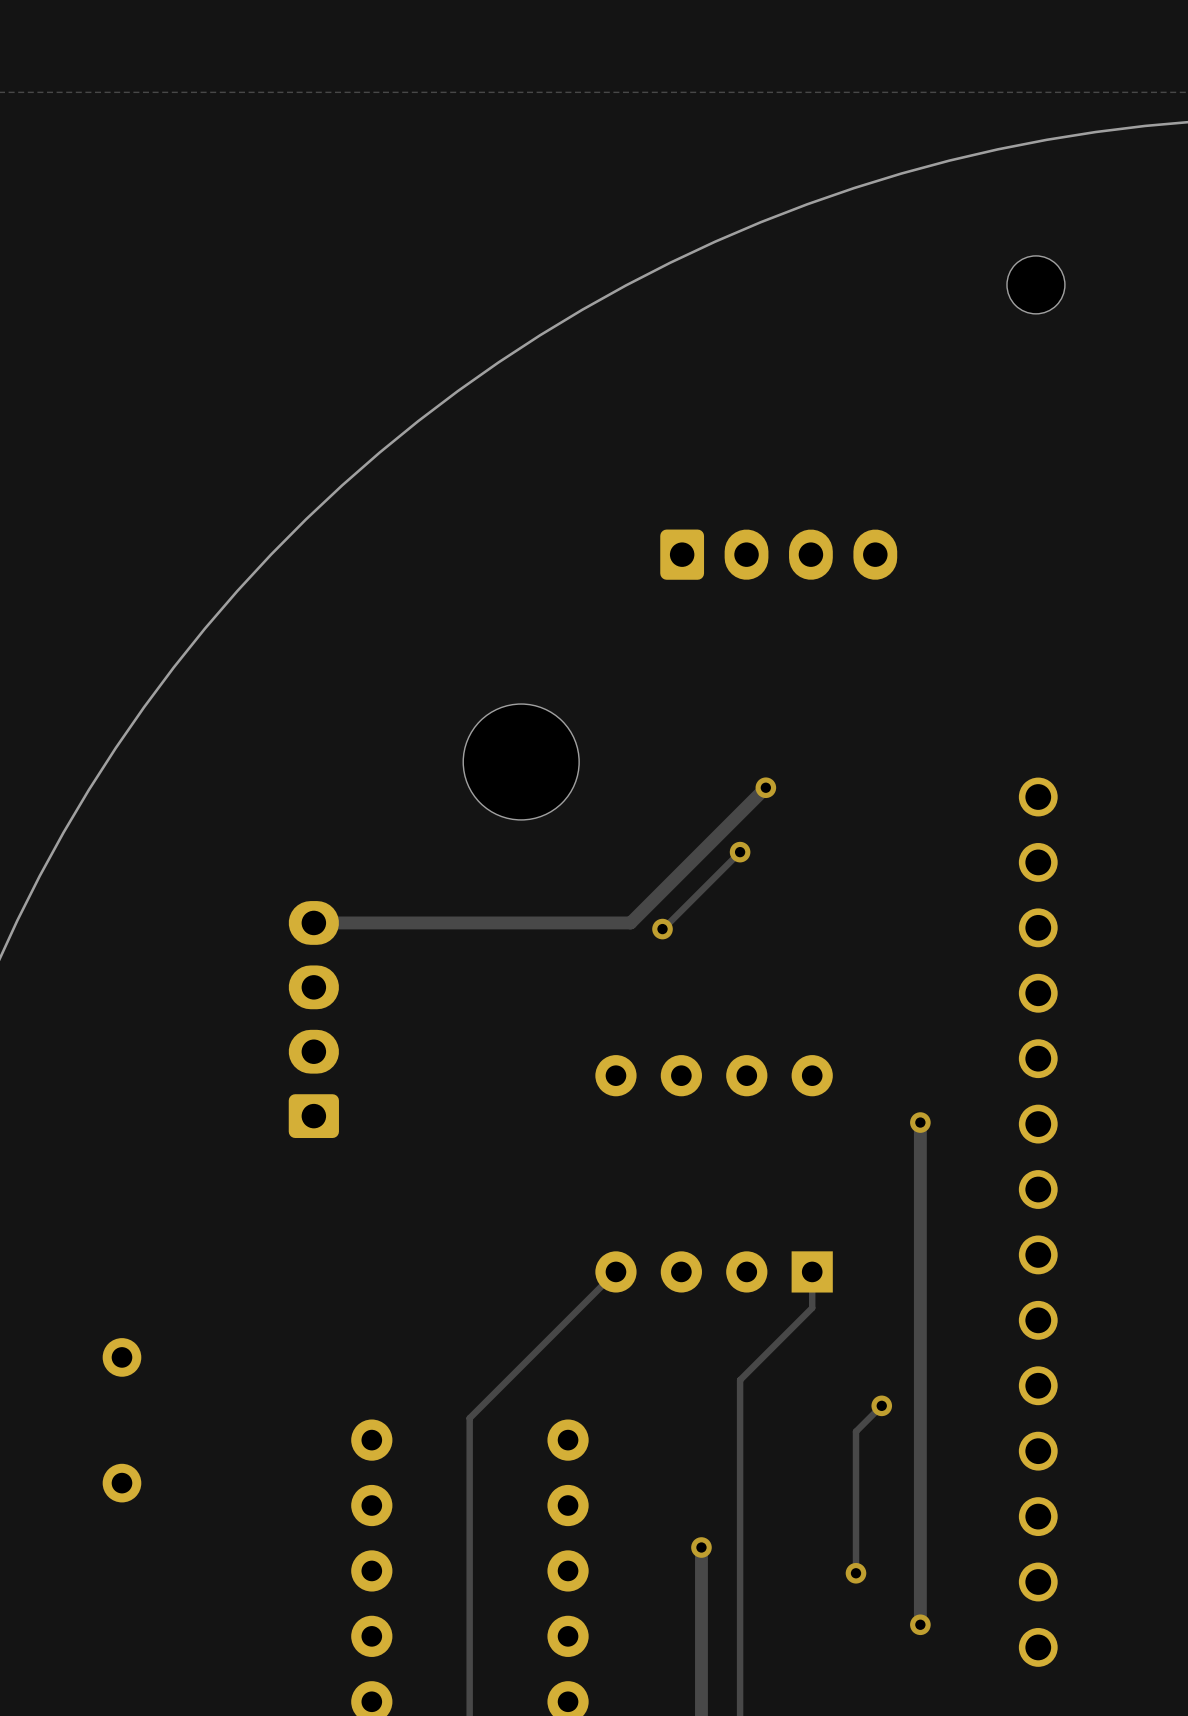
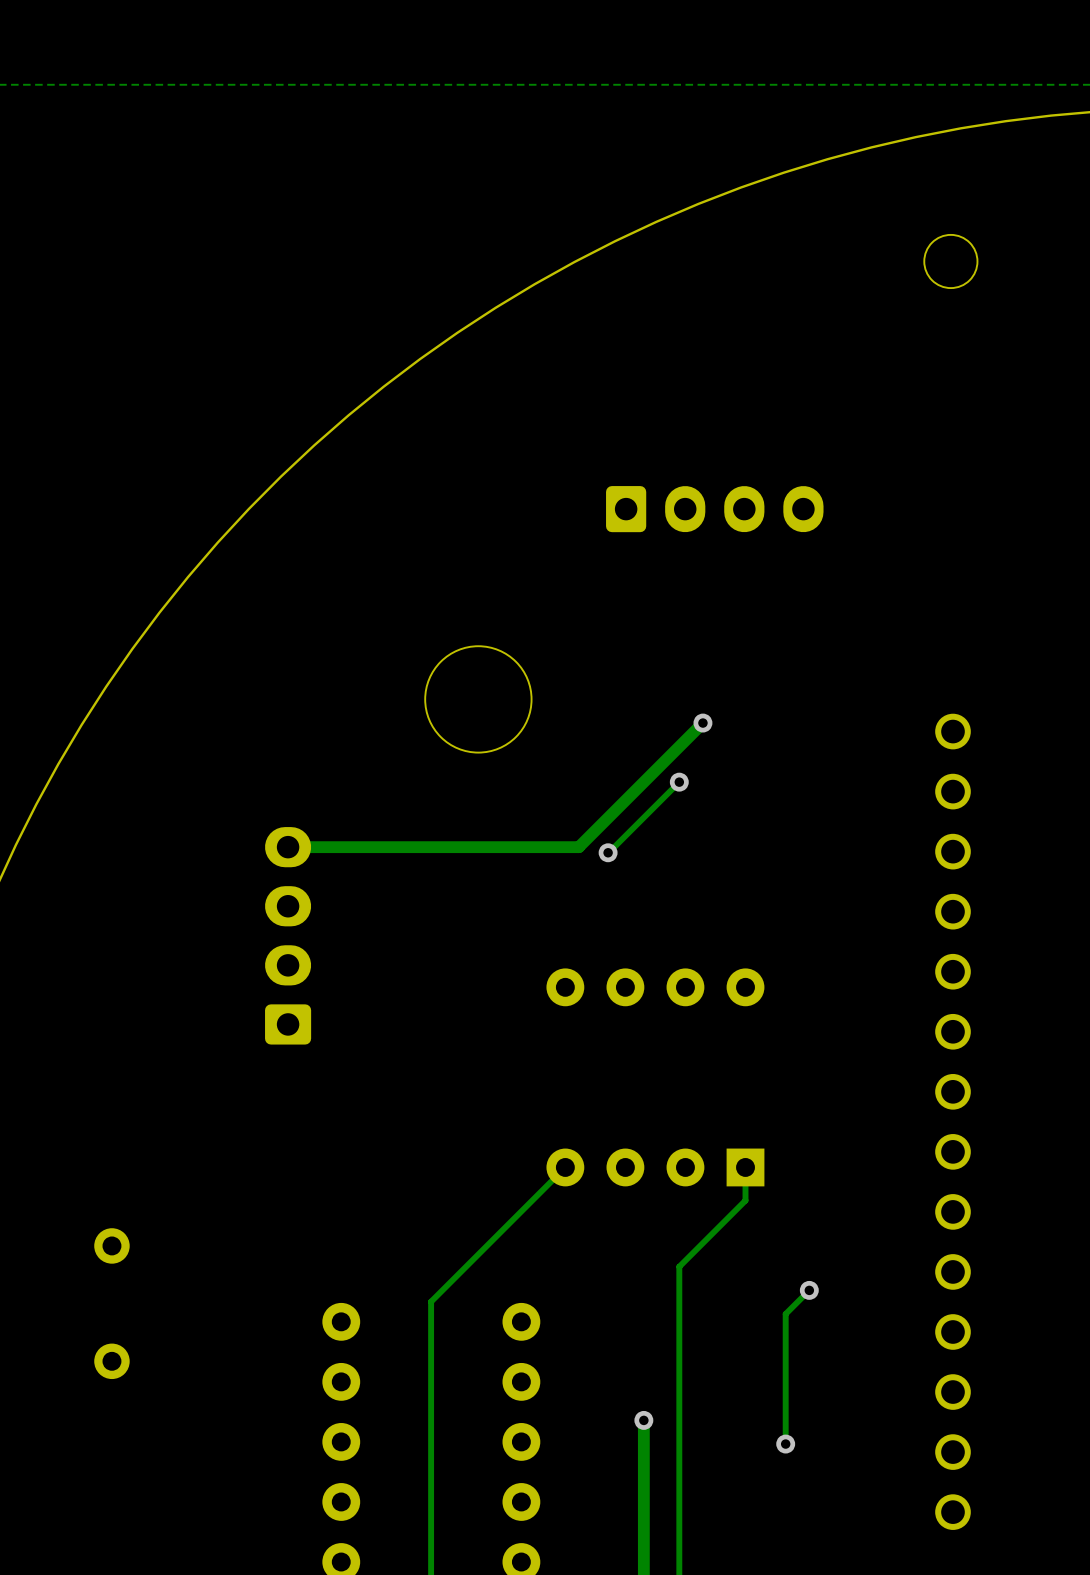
track: (920, 1122) (920, 1624) -> none
via: (920, 1122) -> none
via: (920, 1624) -> none

